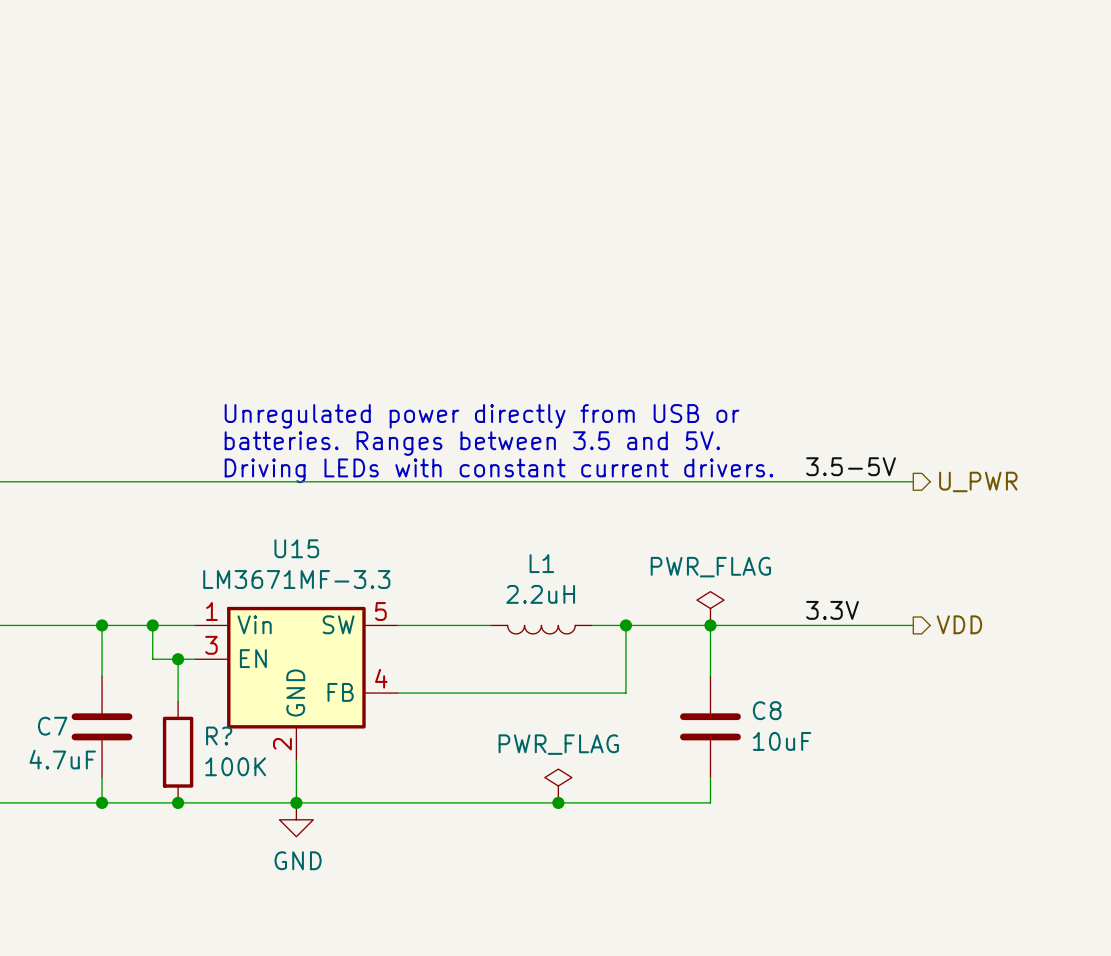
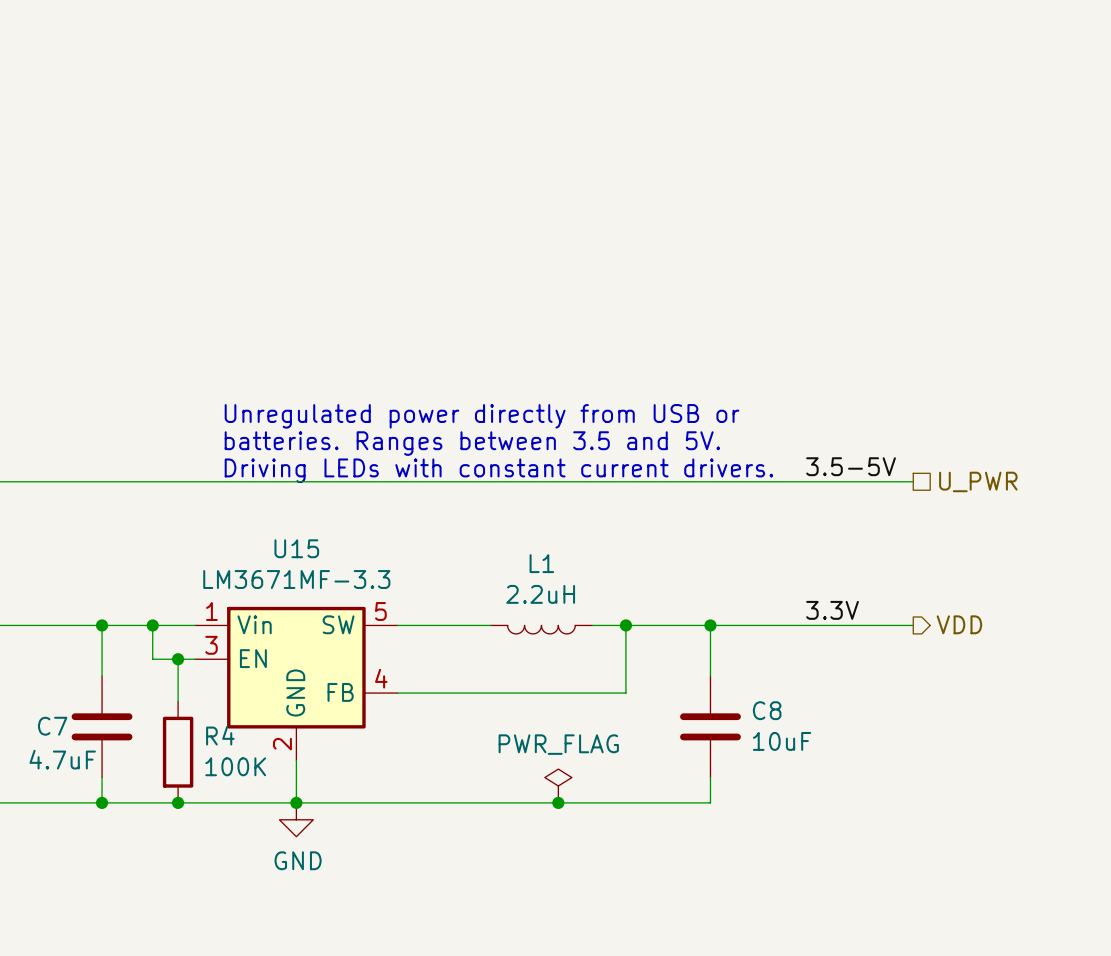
hierarchical label shape: output (978, 481) -> passive (978, 481)
power symbol: PWR_FLAG (710, 608) -> none
R? name: R? (219, 736) -> R4 (220, 735)

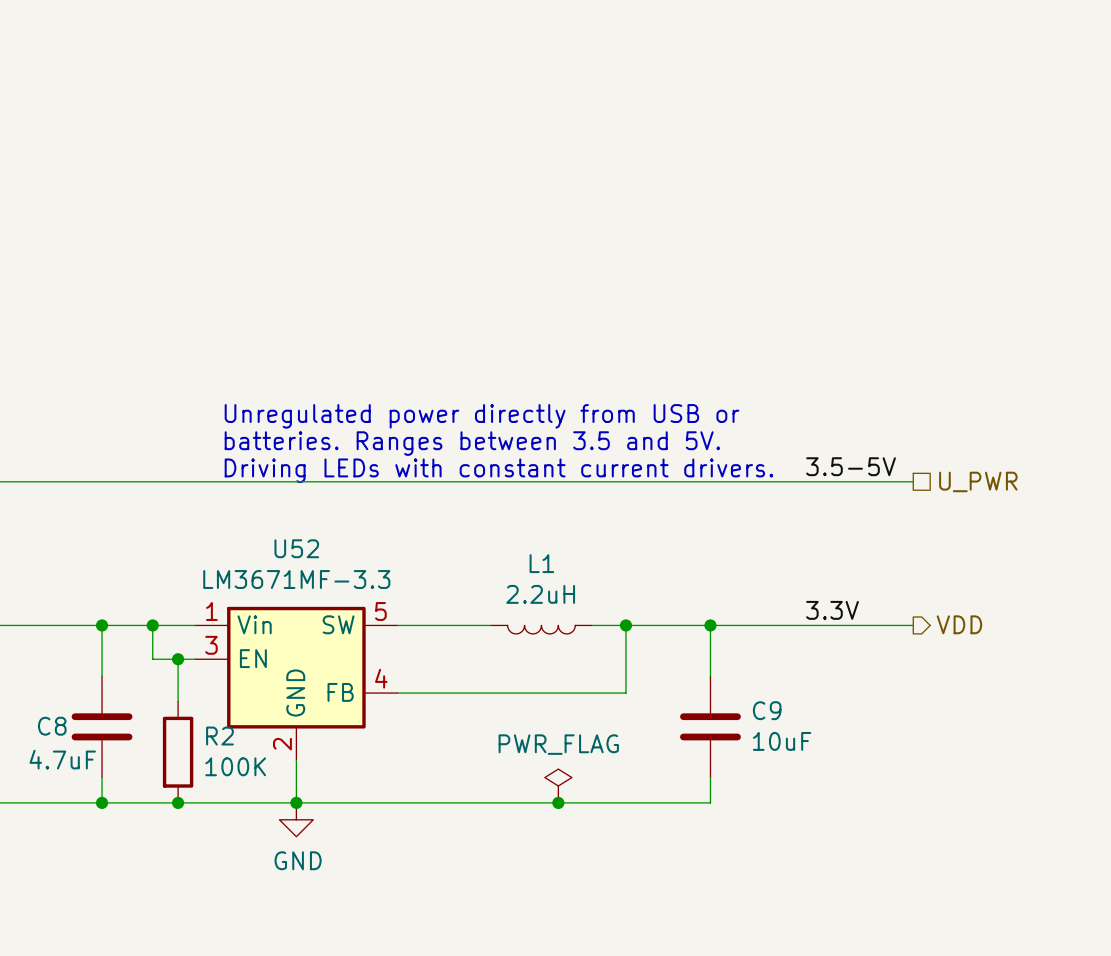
U15 name: U15 (296, 548) -> U52 (296, 548)
C8 name: C8 (767, 710) -> C9 (767, 710)
C7 name: C7 (52, 726) -> C8 (52, 726)
R4 name: R4 (220, 735) -> R2 (219, 736)

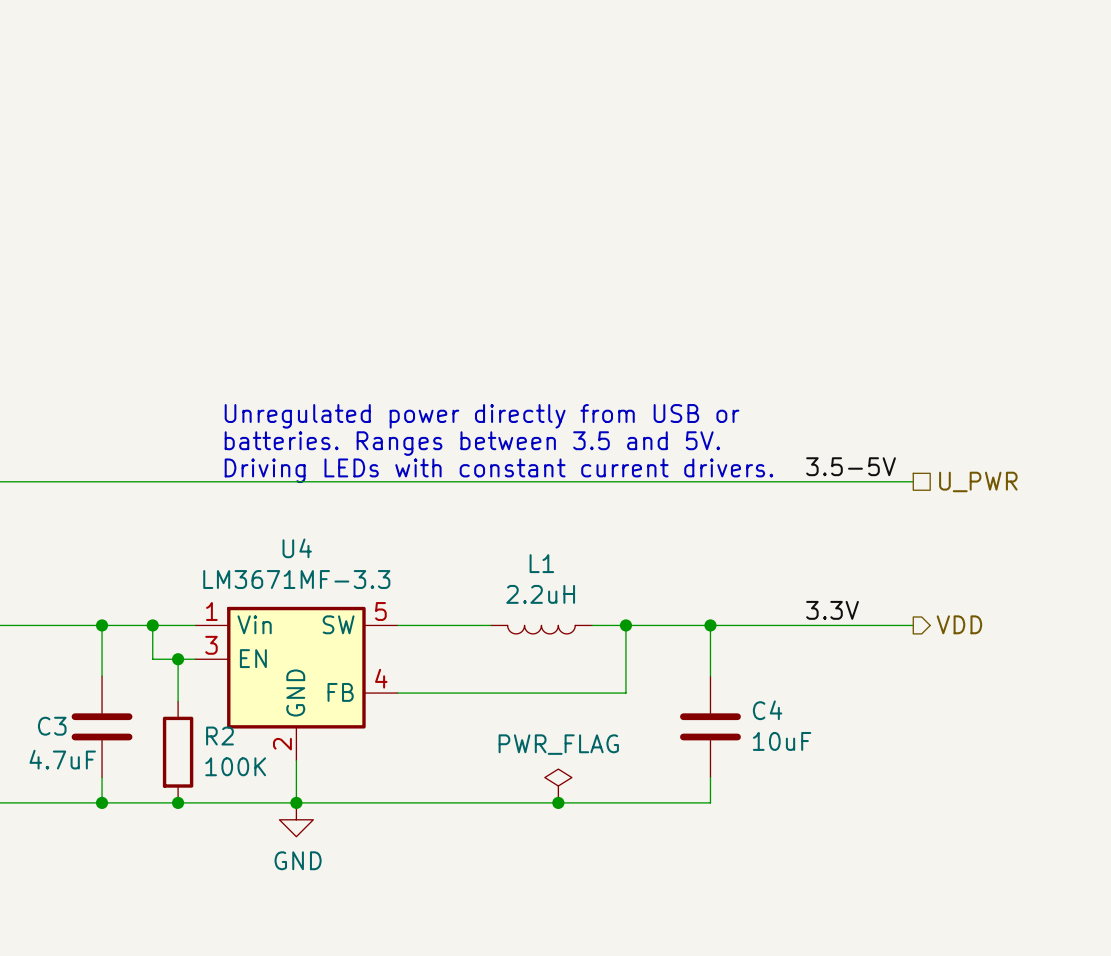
U52 name: U52 (296, 548) -> U4 (297, 548)
C9 name: C9 (767, 710) -> C4 (767, 710)
C8 name: C8 (52, 726) -> C3 (52, 726)

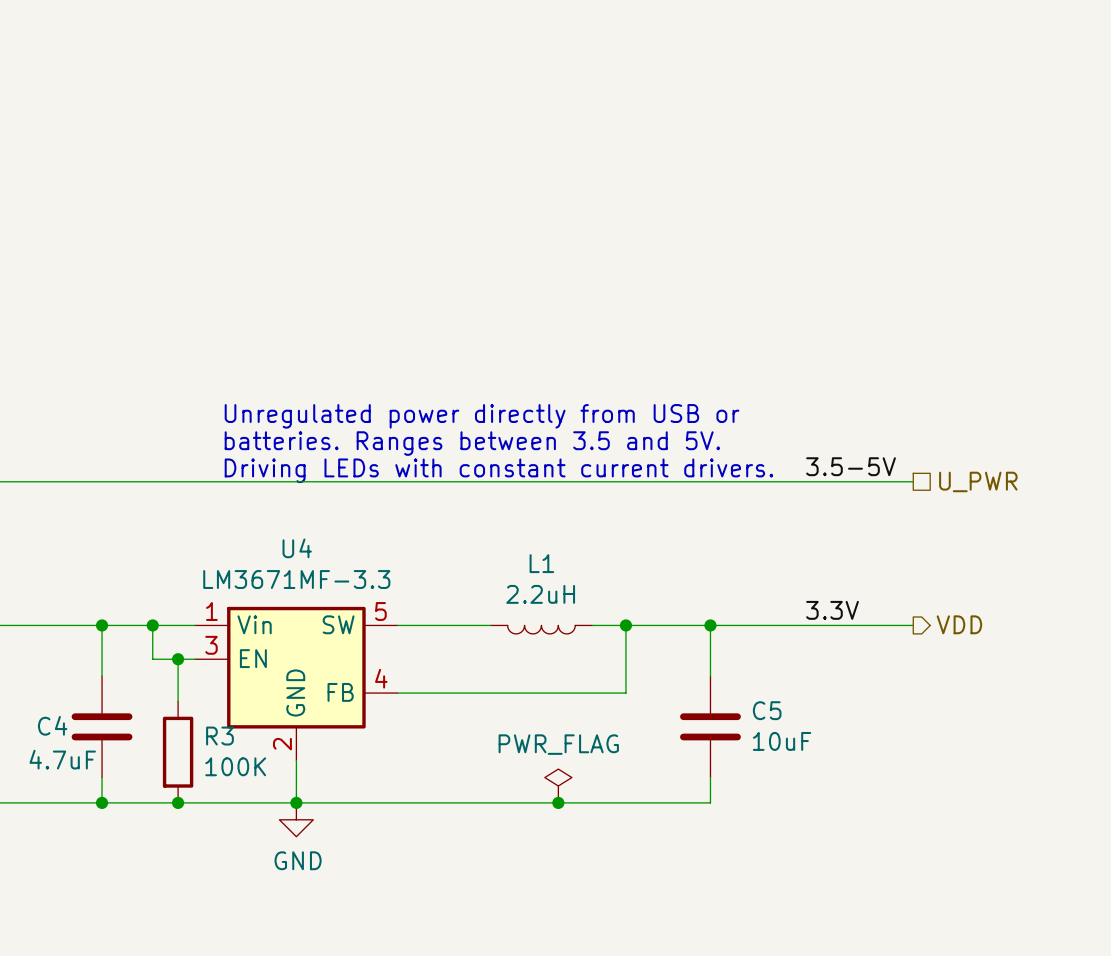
C4 name: C4 (767, 710) -> C5 (767, 710)
C3 name: C3 (52, 726) -> C4 (52, 725)
R2 name: R2 (219, 736) -> R3 (219, 736)

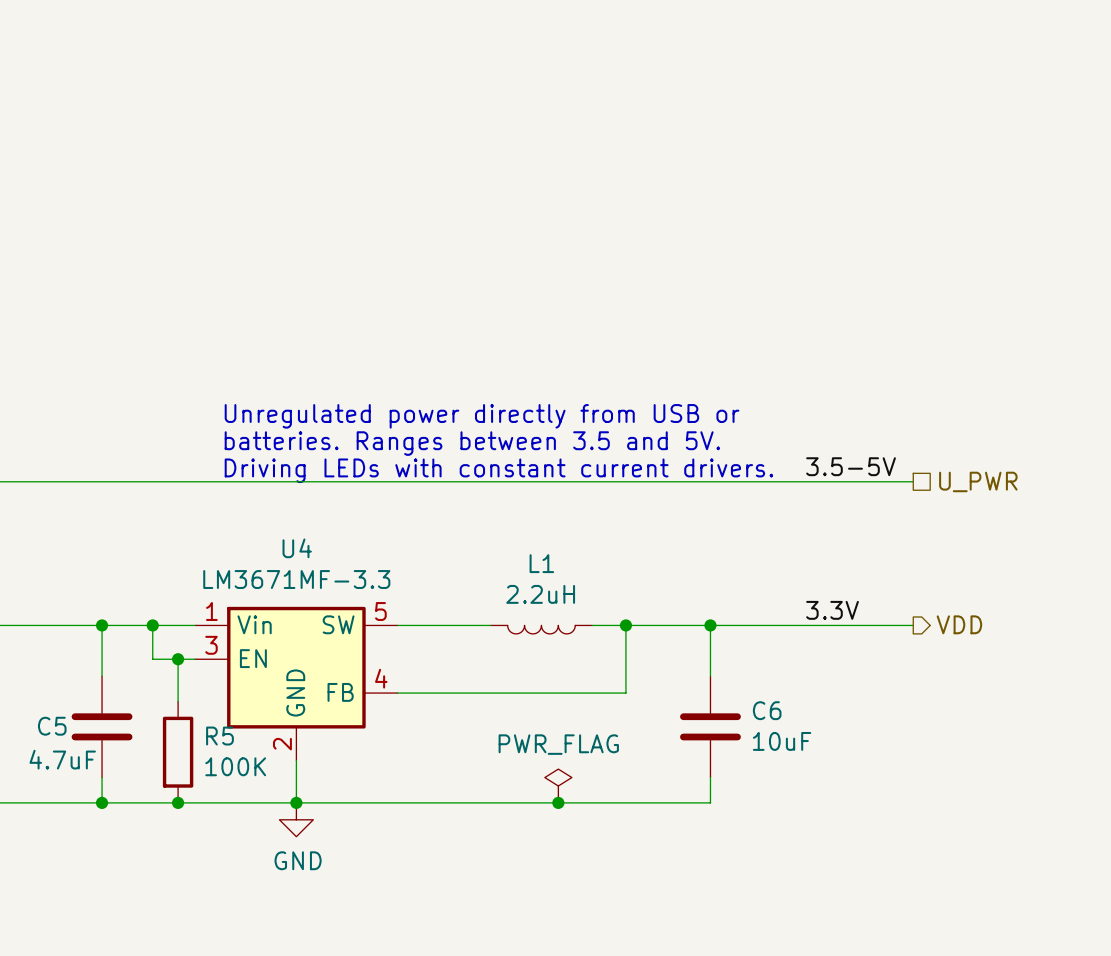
C5 name: C5 (767, 710) -> C6 (767, 710)
C4 name: C4 (52, 725) -> C5 (52, 726)
R3 name: R3 (219, 736) -> R5 (219, 736)

